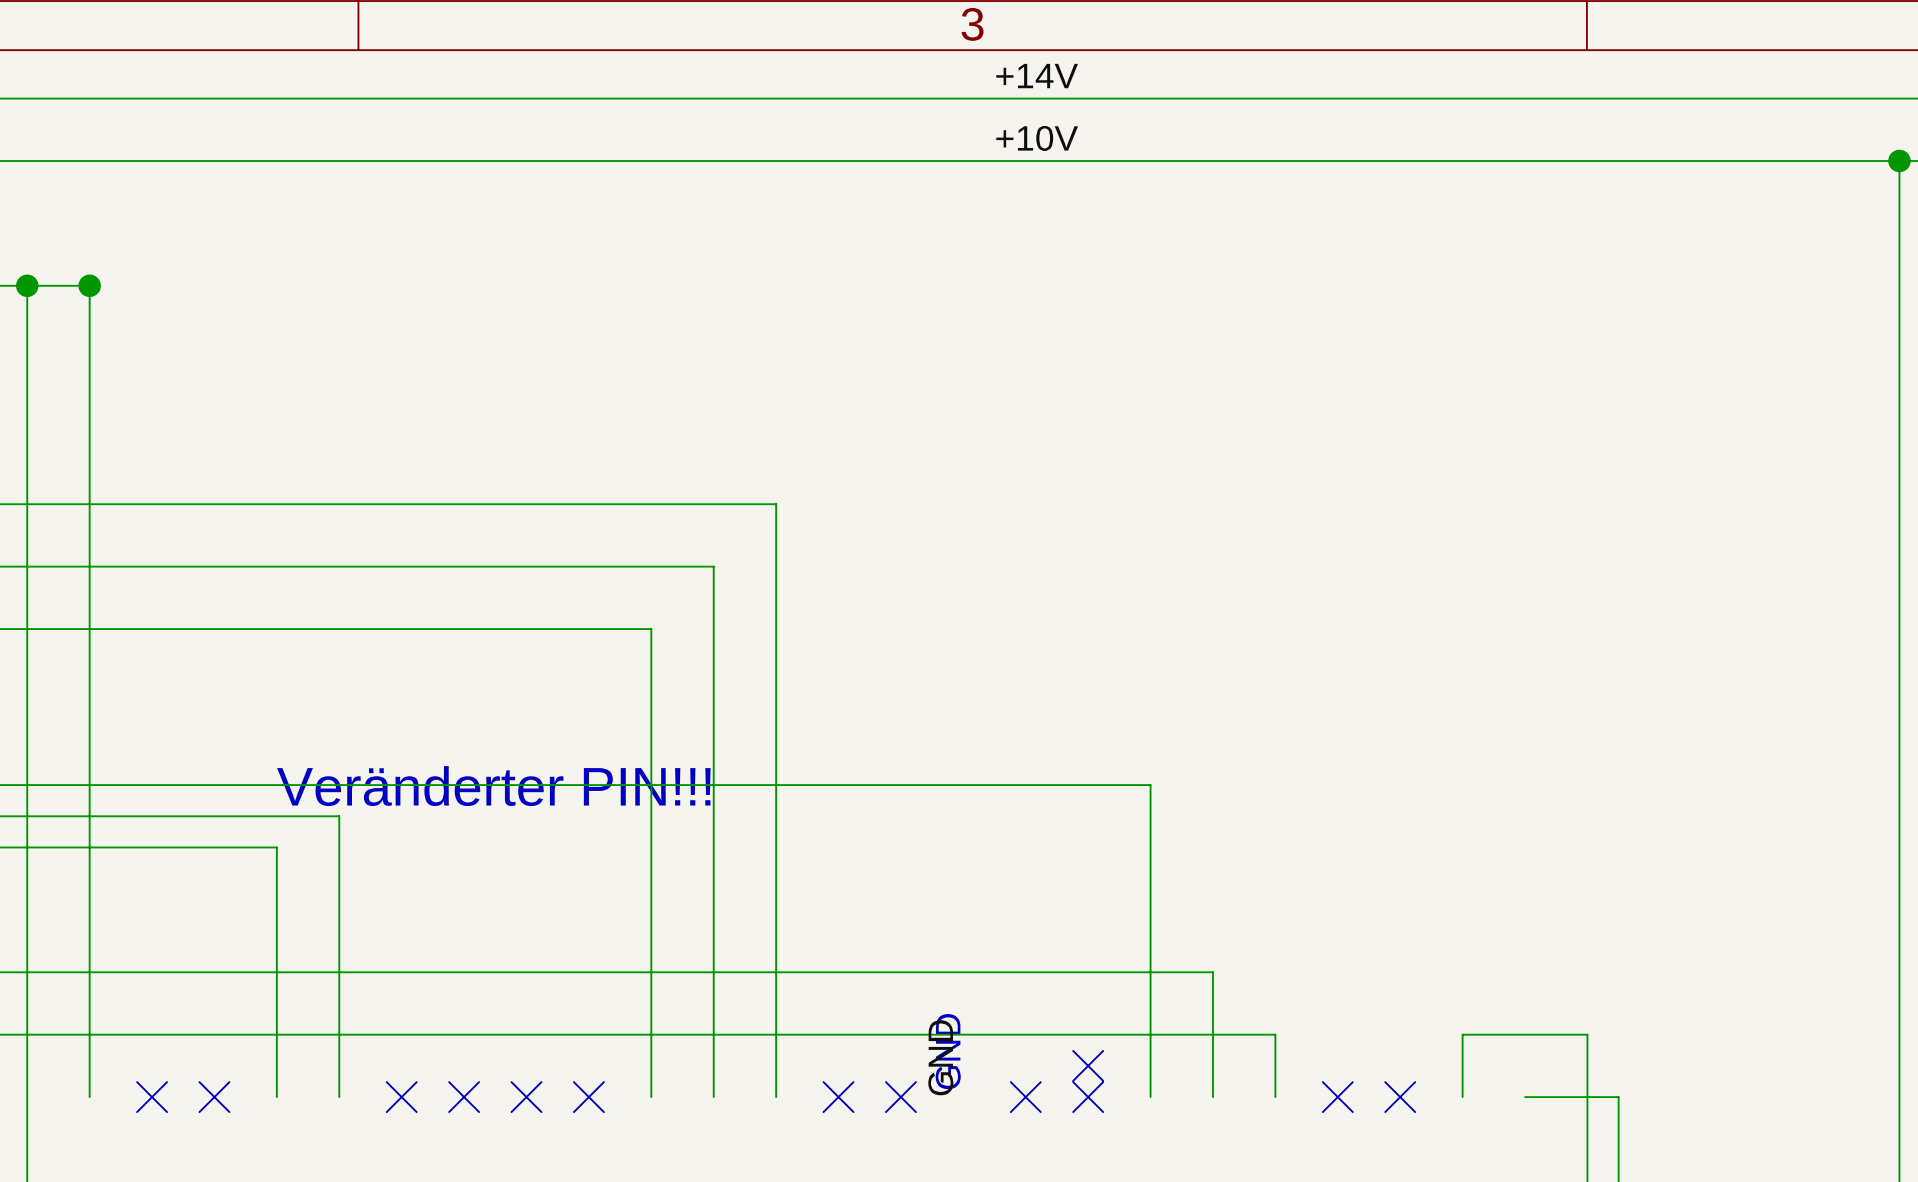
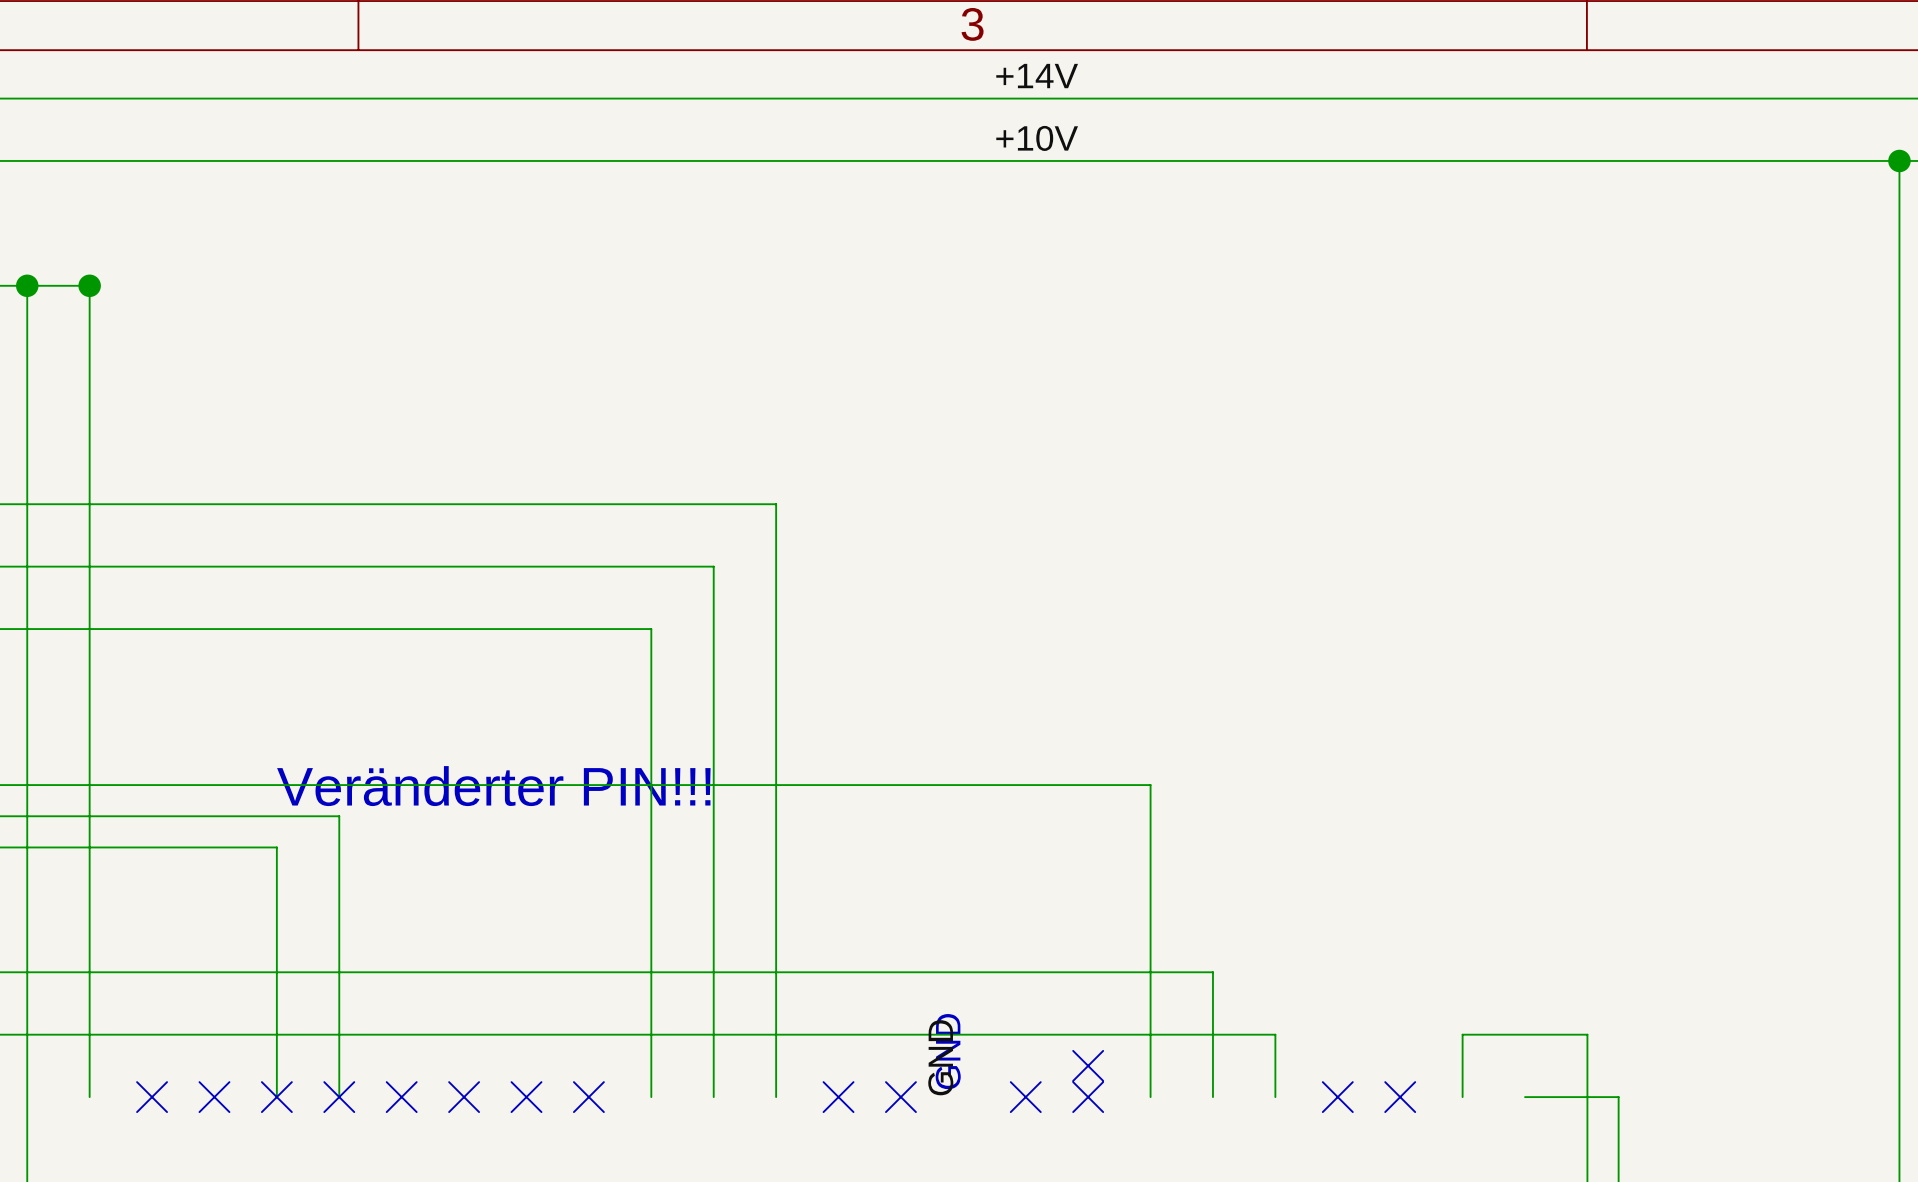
no-connect mark: none -> (276, 1097)
no-connect mark: none -> (339, 1097)

